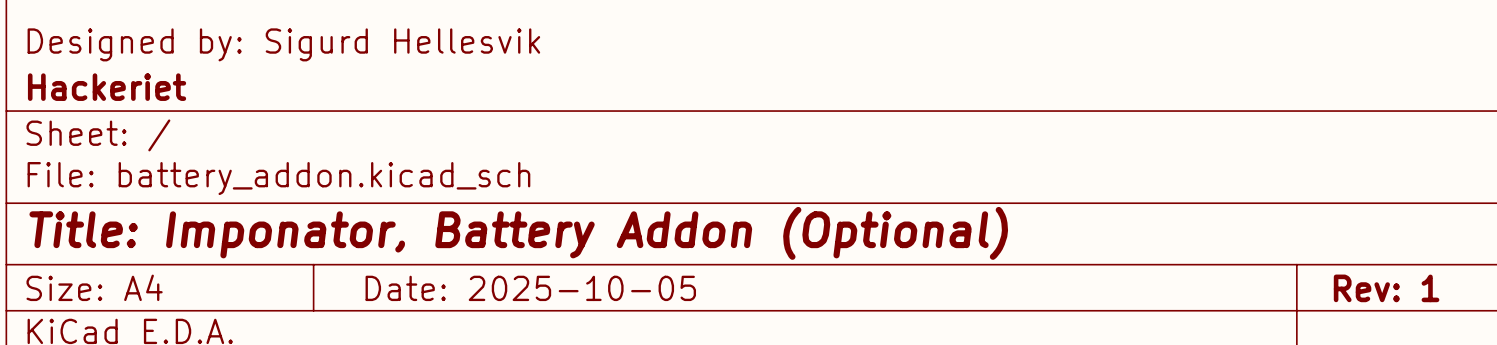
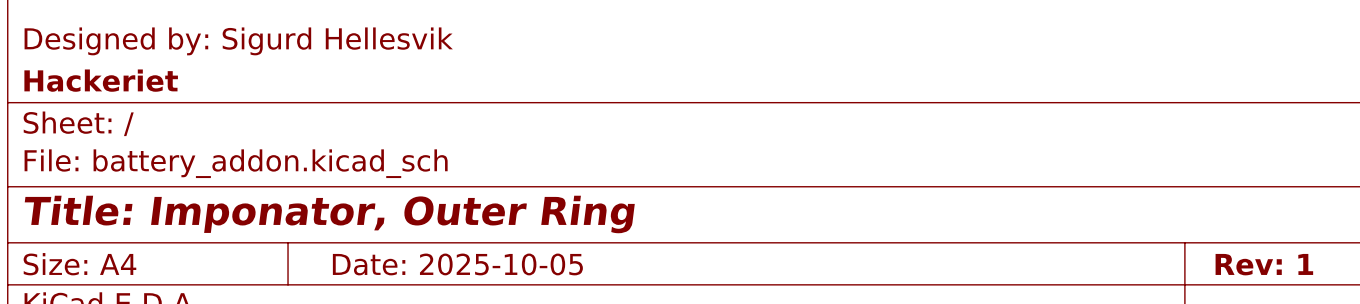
title block: Title: Imponator, Battery Addon (Optional) (518, 233) -> Title: Imponator, Outer Ring (329, 214)

